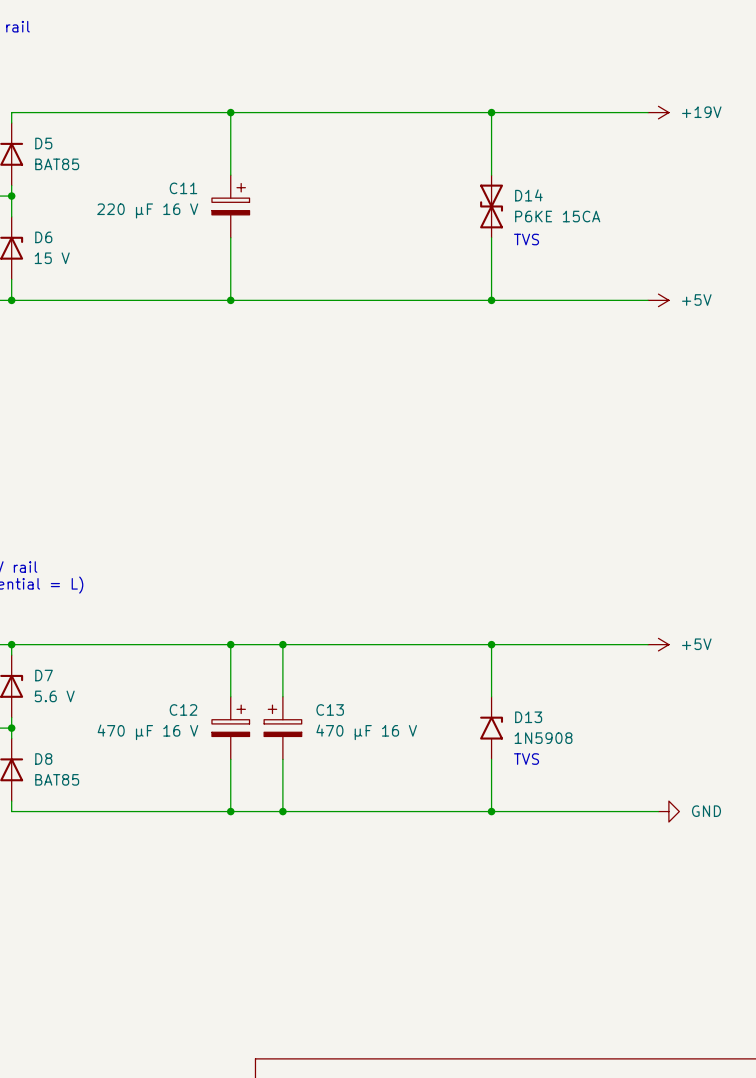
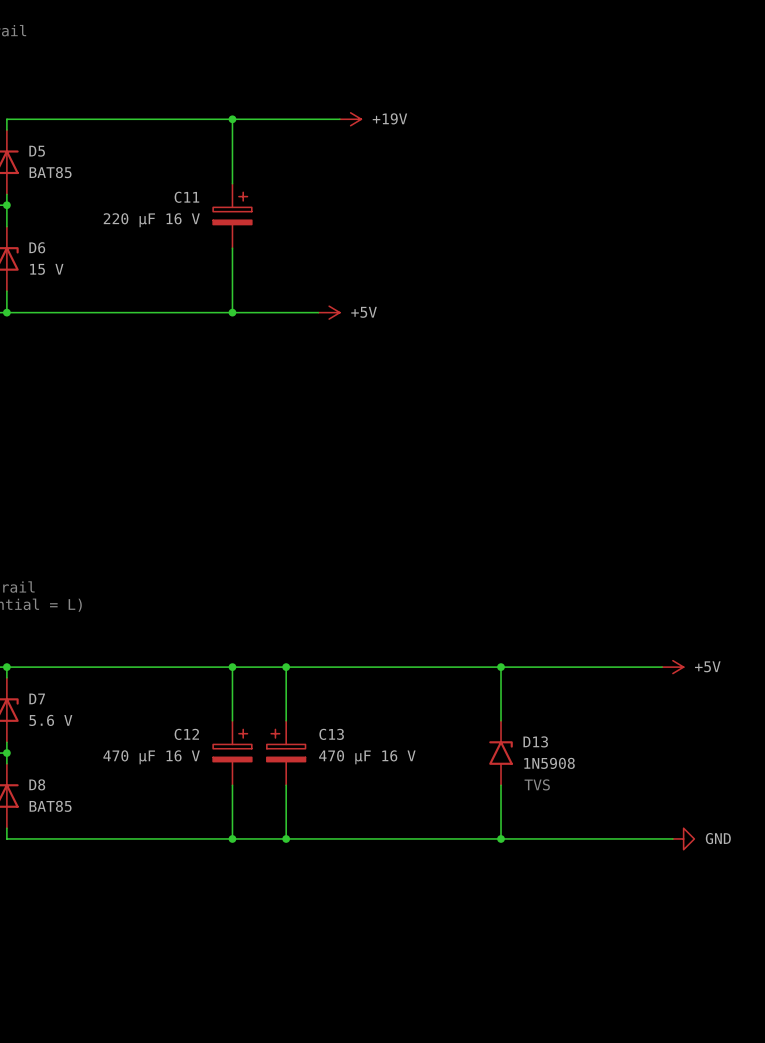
wire: (335, 112) (648, 112) -> none
power symbol: none -> +19V (350, 119)
wire: (491, 112) (491, 175) -> none
junction: (491, 112) -> none
power symbol: +19V (658, 112) -> none
D14: P6KE 15CA (491, 206) -> none
wire: (491, 237) (491, 300) -> none
text: TVS (526, 239) -> none
wire: (314, 300) (648, 300) -> none
power symbol: none -> +5V (329, 312)
junction: (491, 300) -> none
power symbol: +5V (658, 300) -> none

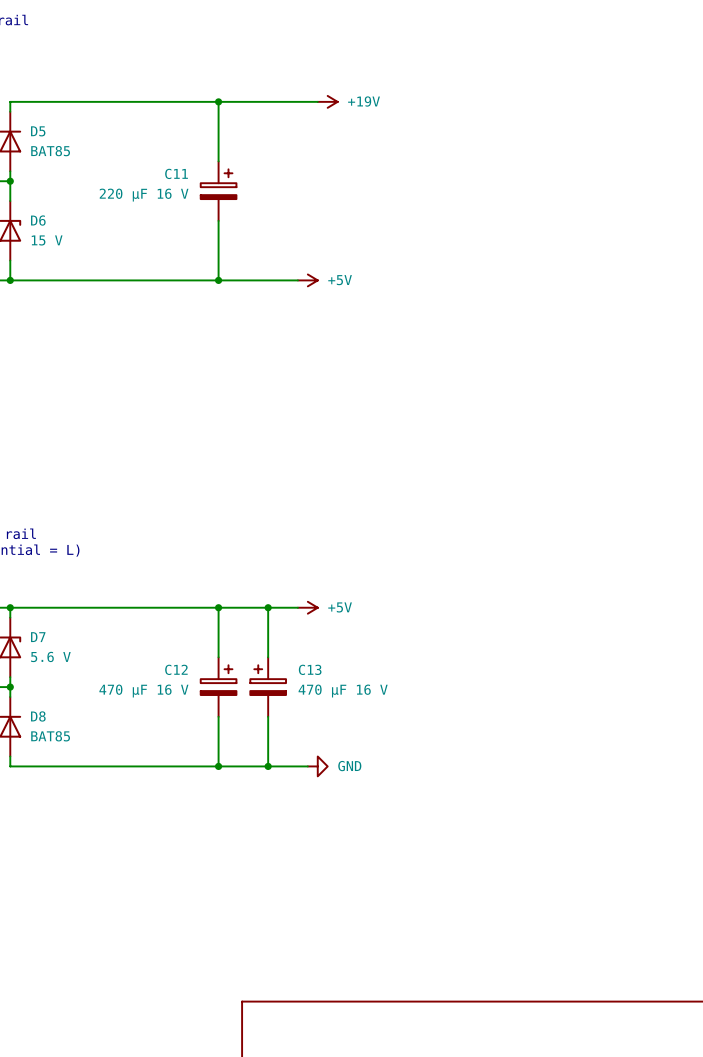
wire: (318, 667) (662, 667) -> none
power symbol: none -> +5V (307, 607)
wire: (501, 667) (501, 720) -> none
junction: (501, 667) -> none
power symbol: +5V (672, 667) -> none
D13: 1N5908 (501, 753) -> none
text: TVS (537, 784) -> none
wire: (501, 785) (501, 838) -> none
wire: (329, 838) (672, 838) -> none
power symbol: none -> GND (317, 766)
junction: (501, 838) -> none
power symbol: GND (683, 838) -> none

